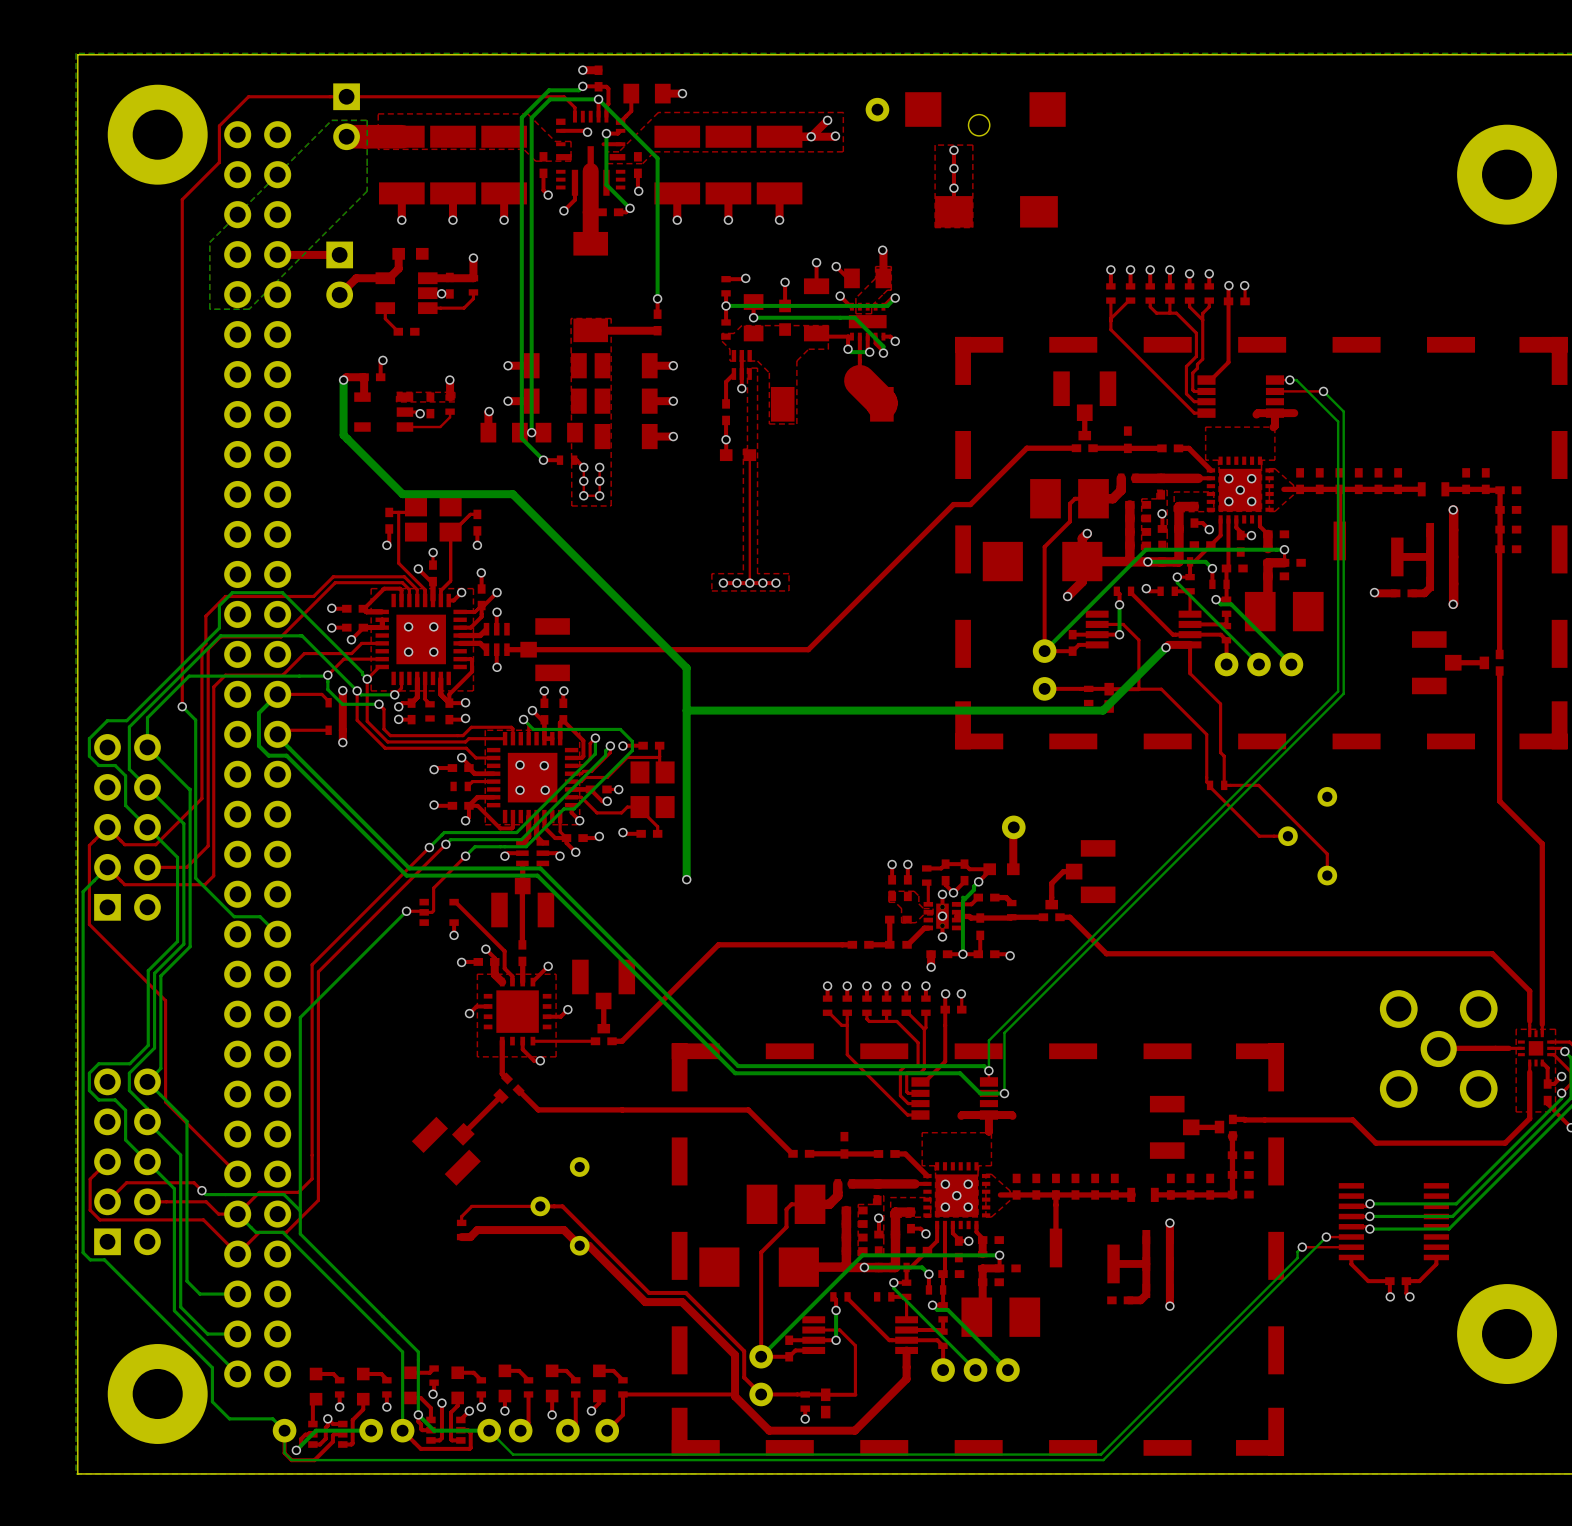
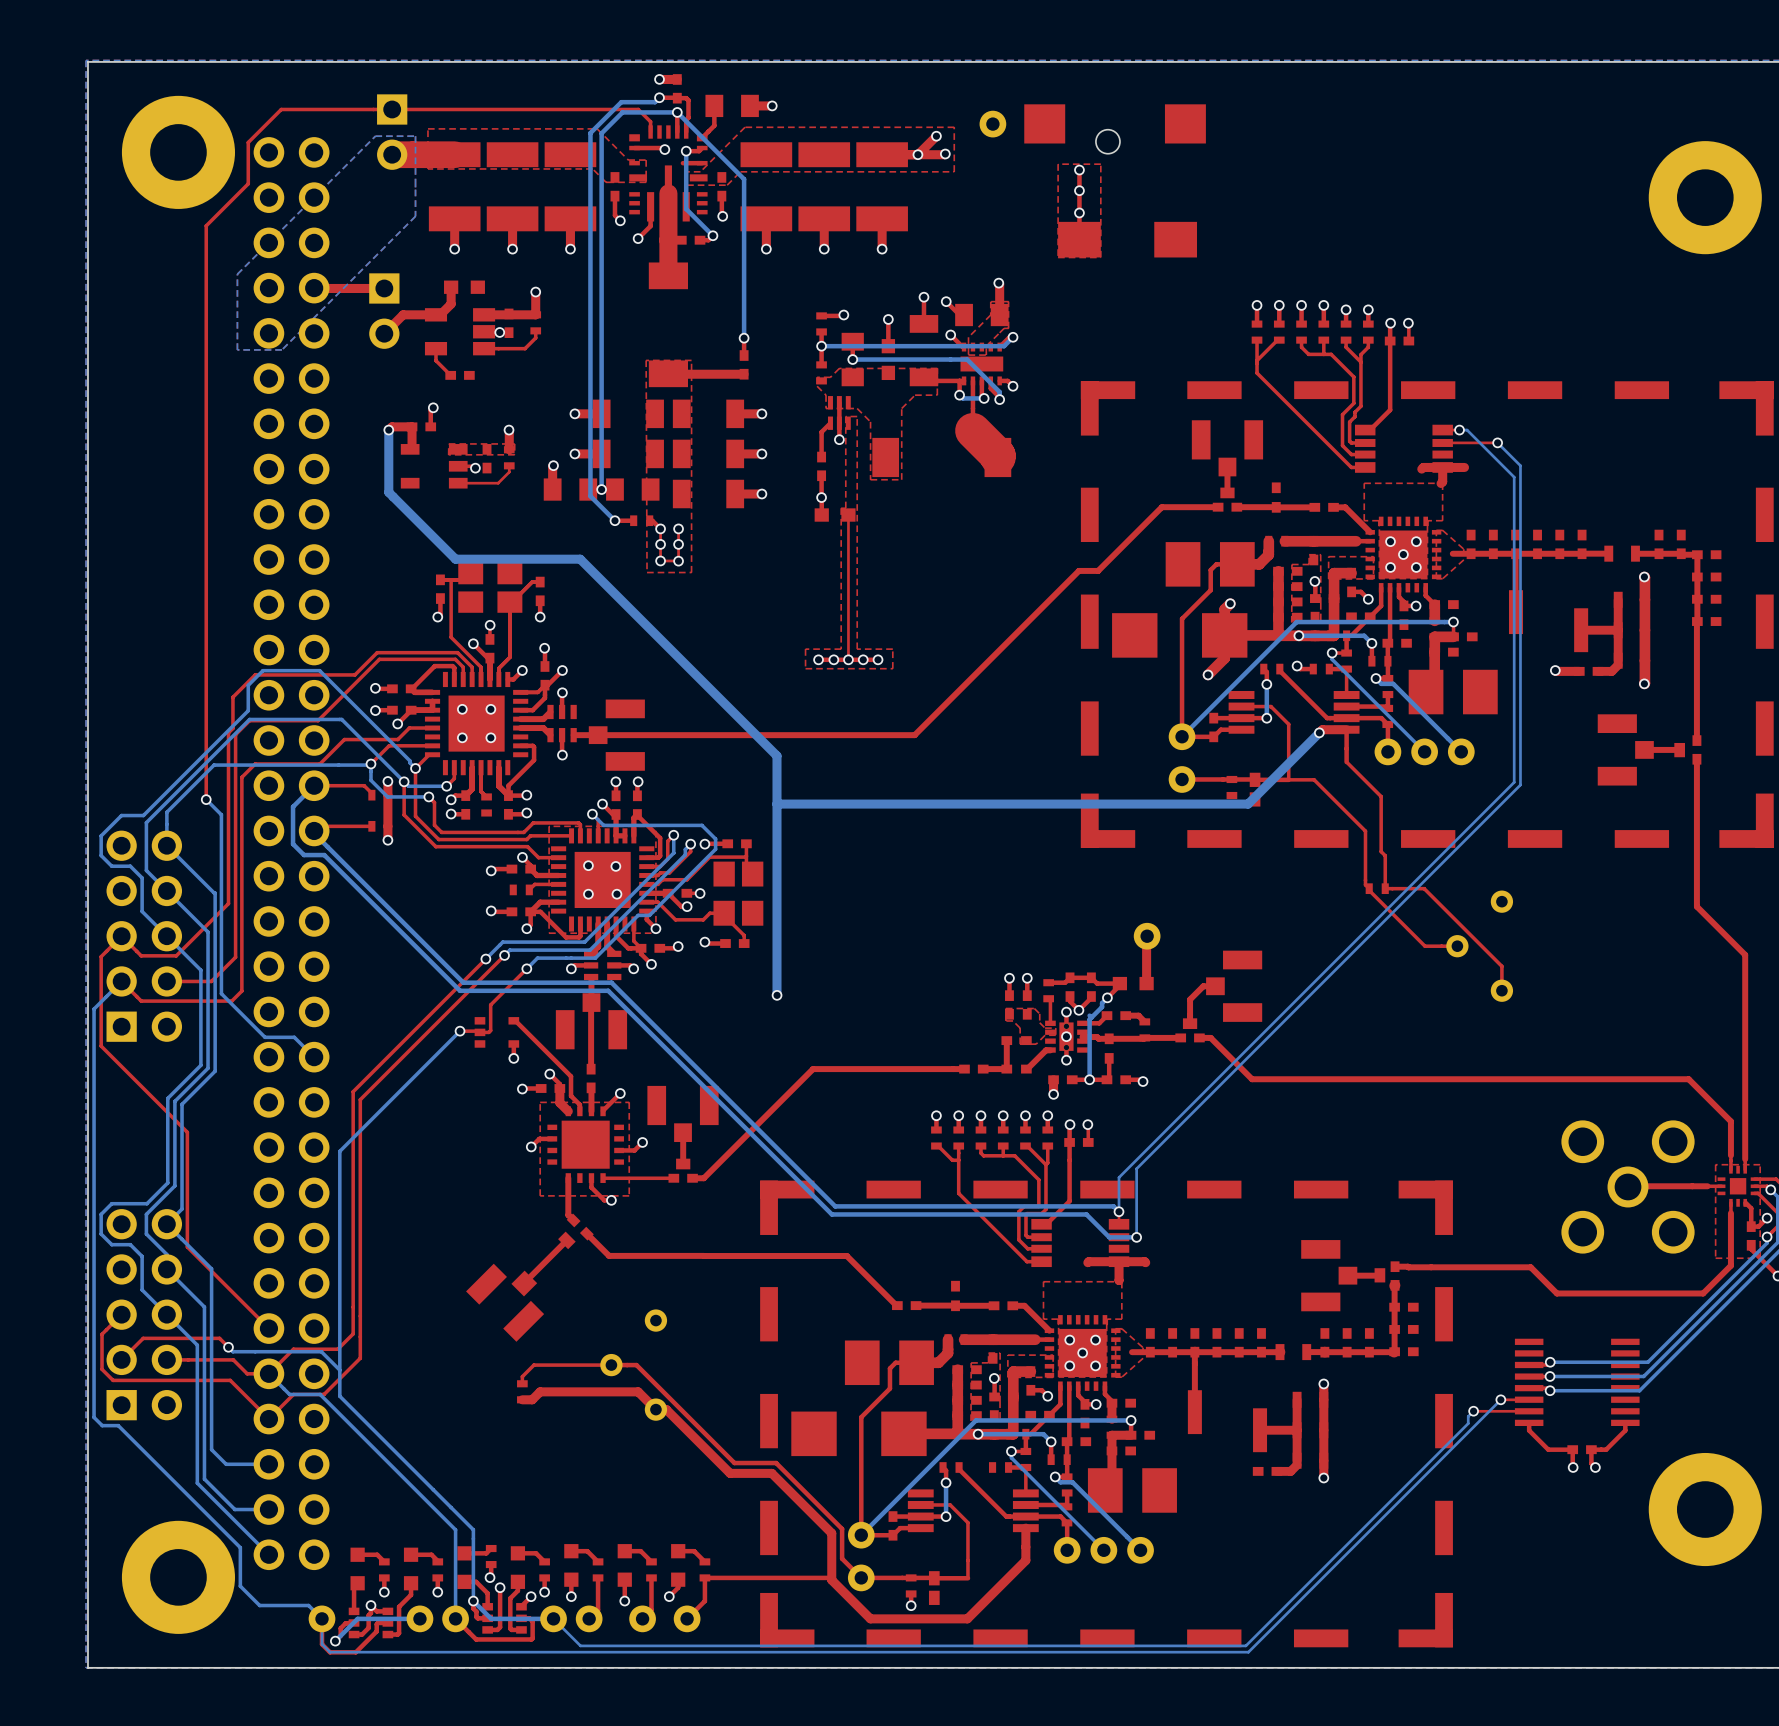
top zone outline: (473, 588) (371, 588) (371, 690) (473, 690) (473, 588) -> none

